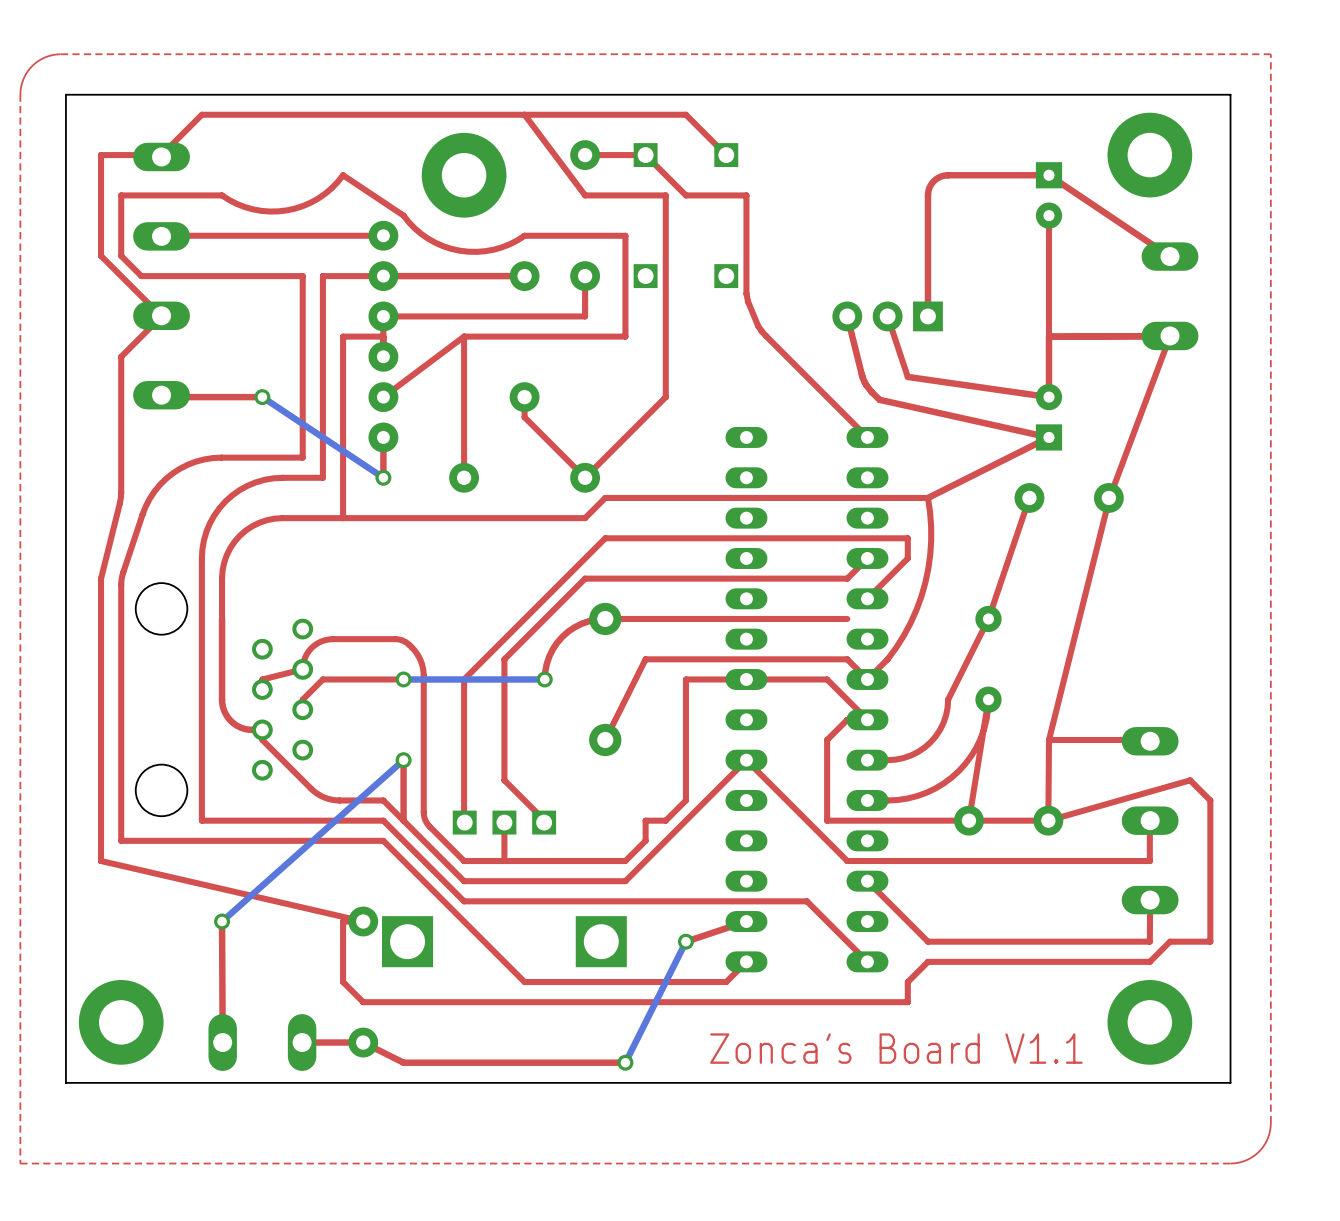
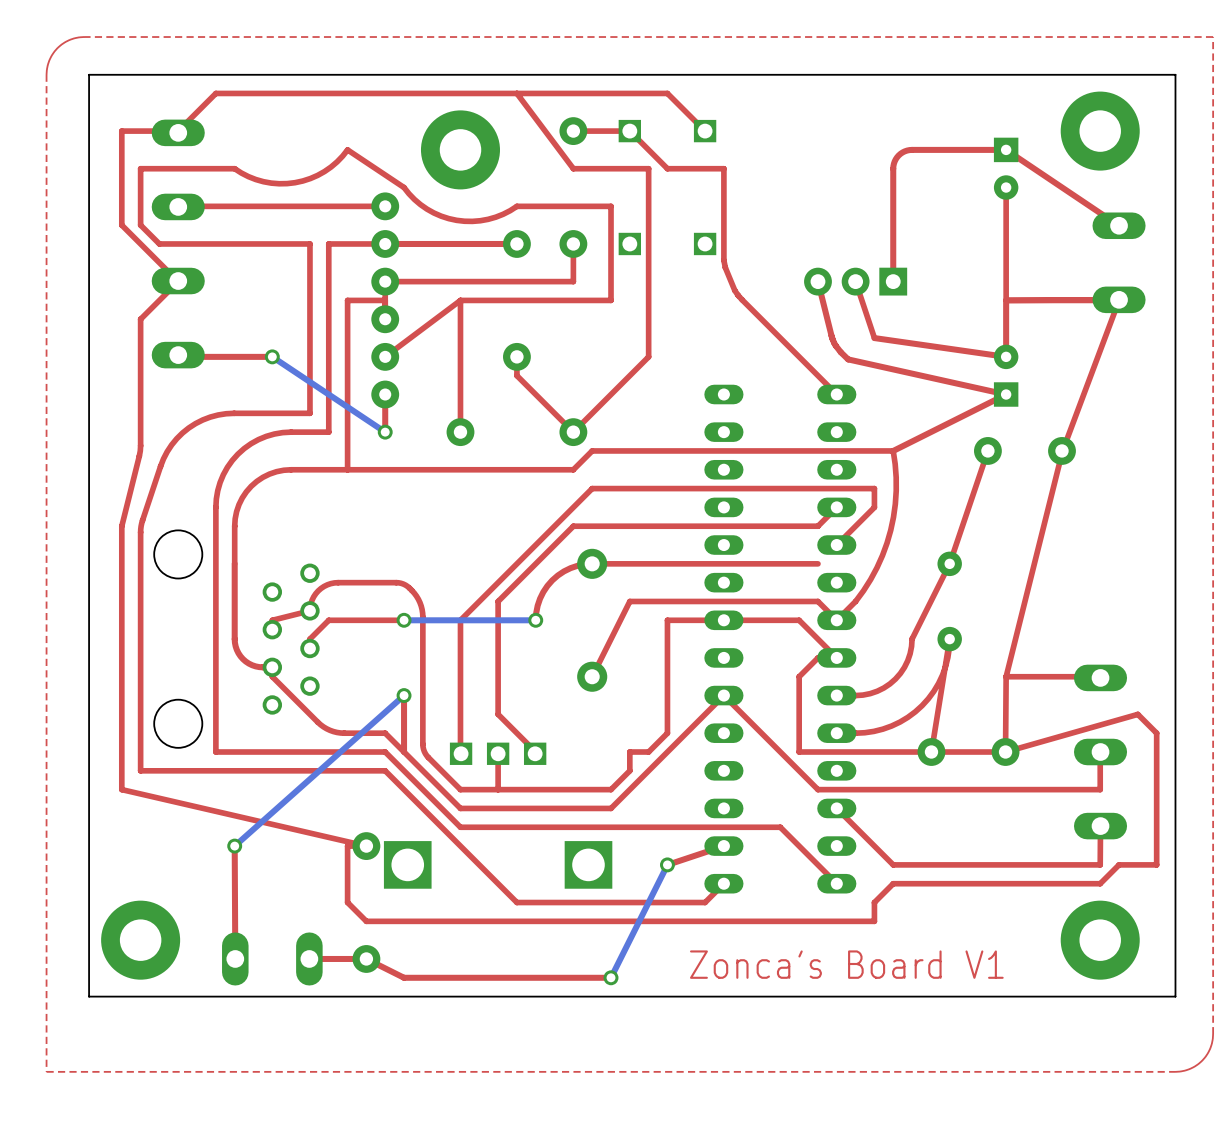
text: Zonca's Board V1.1 (896, 1048) -> Zonca's Board V1 (846, 964)

